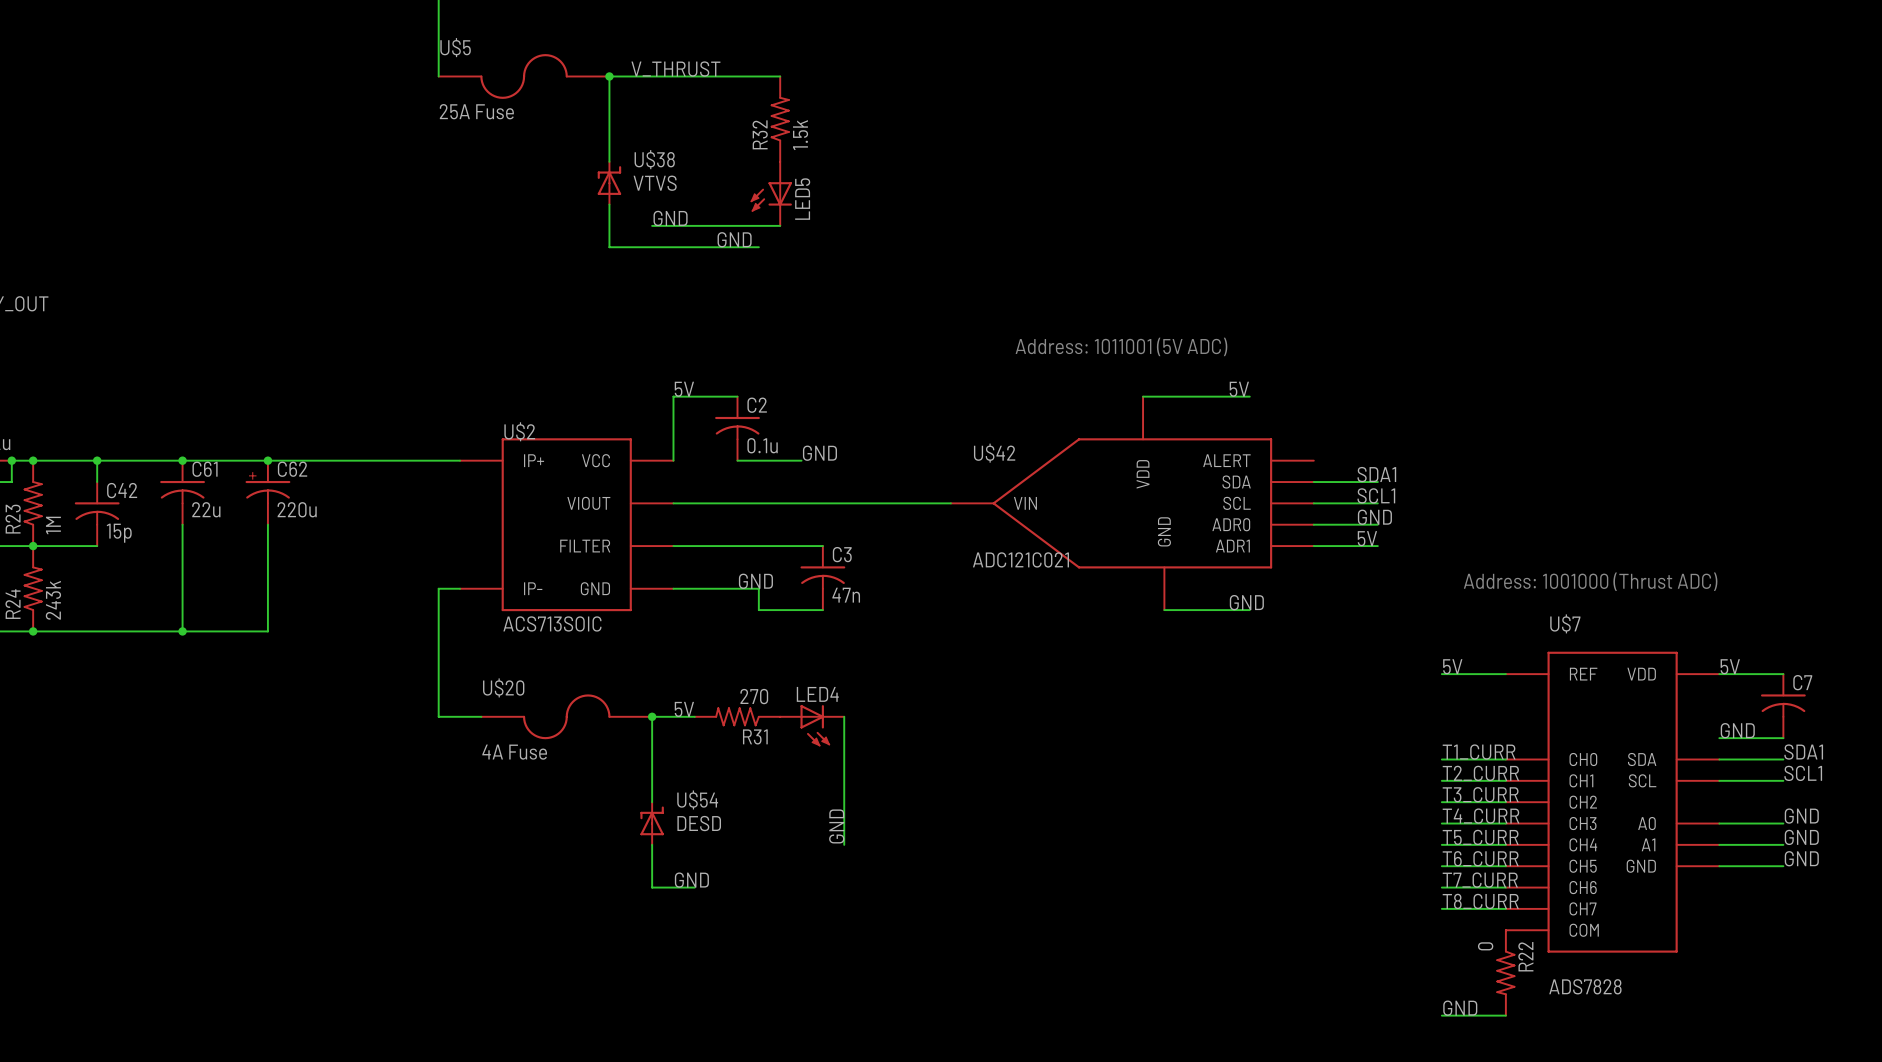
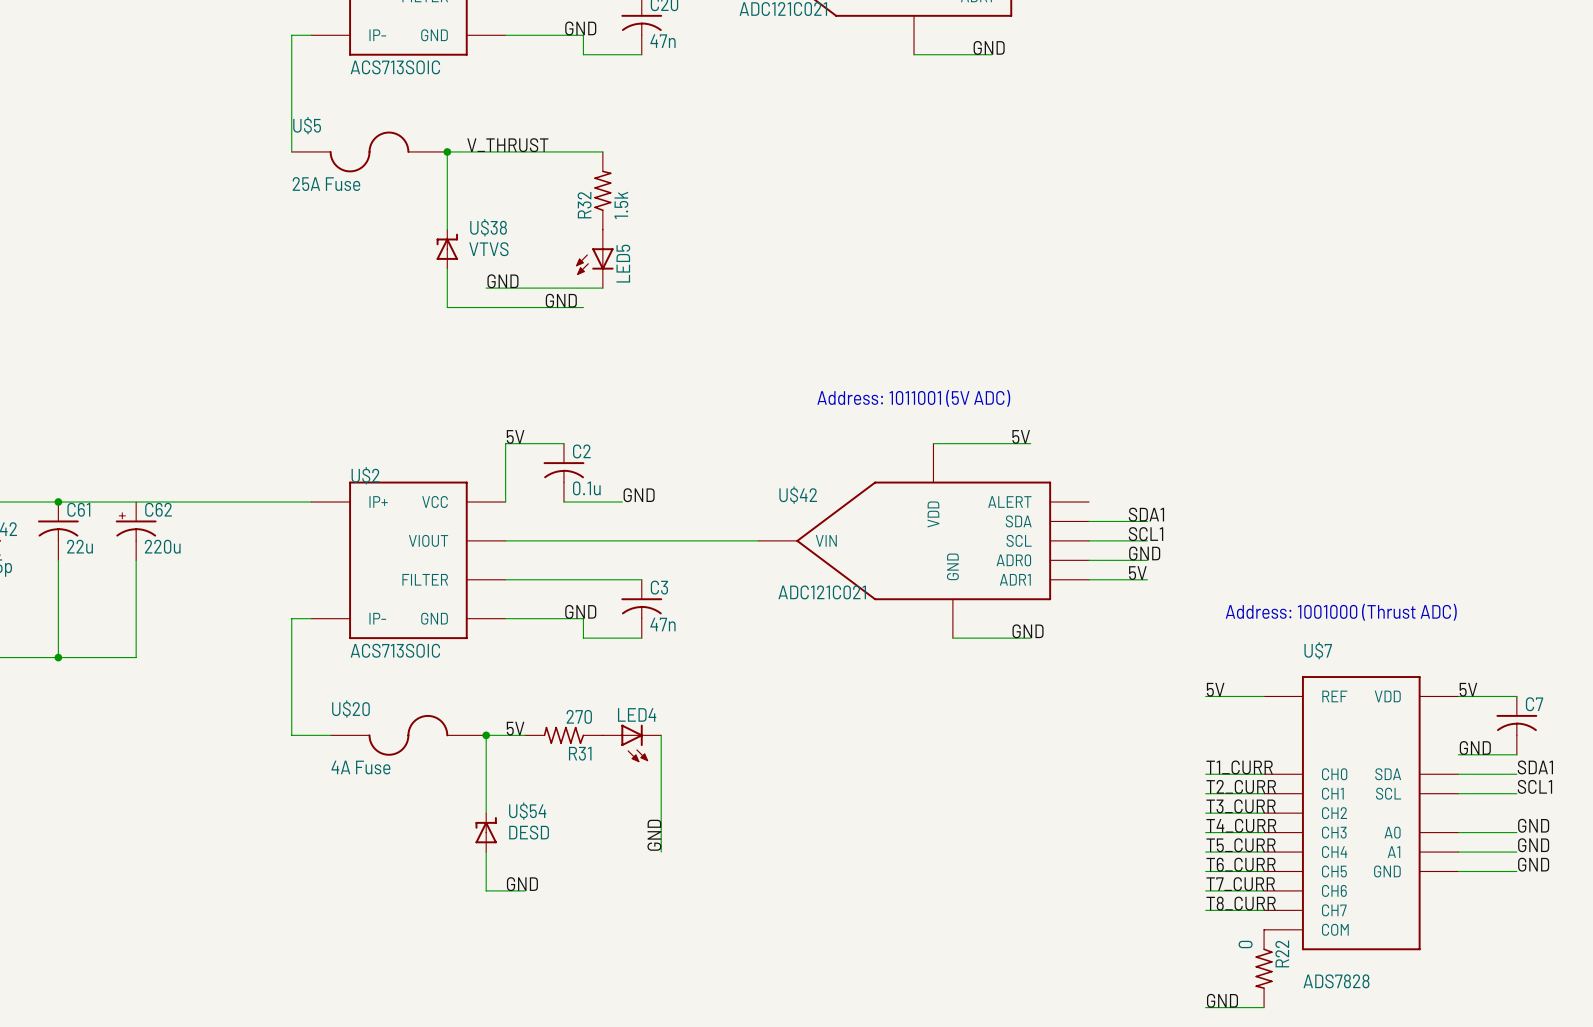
junction: (267, 460) -> none

